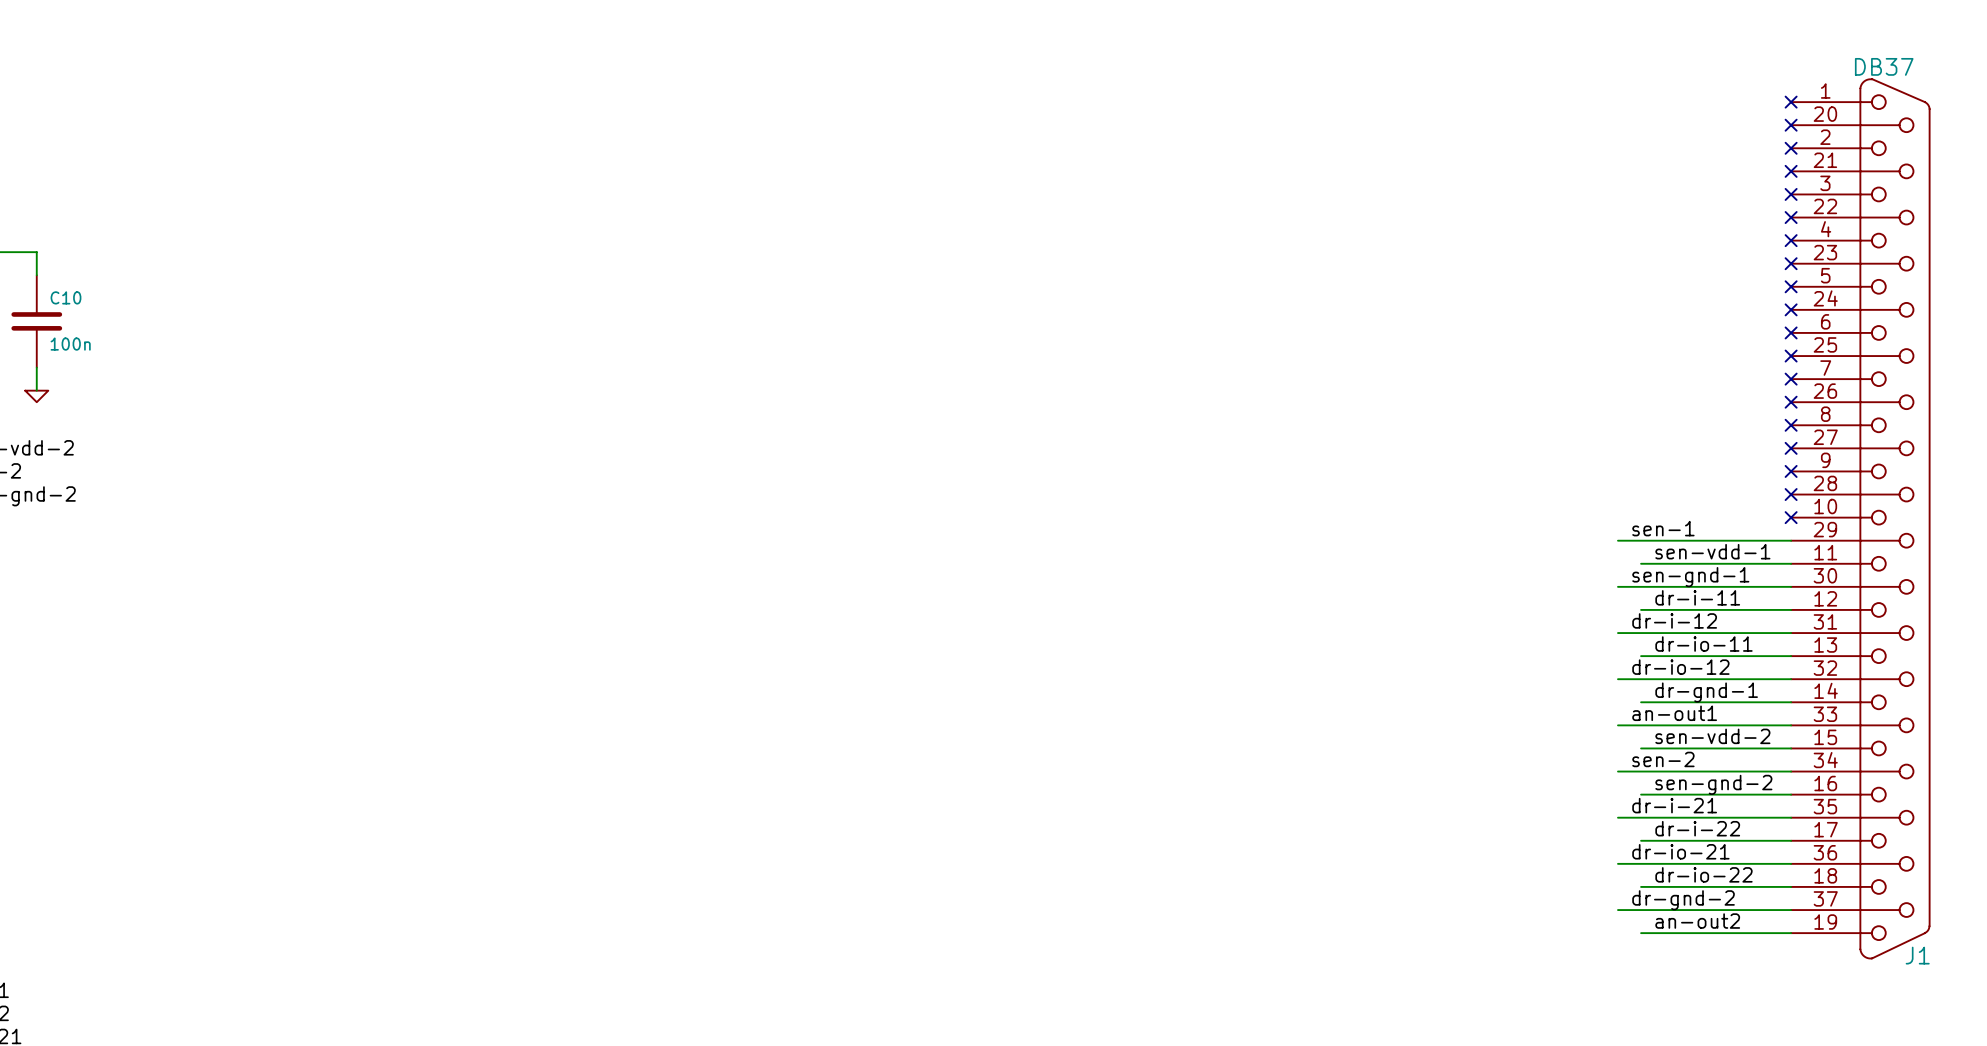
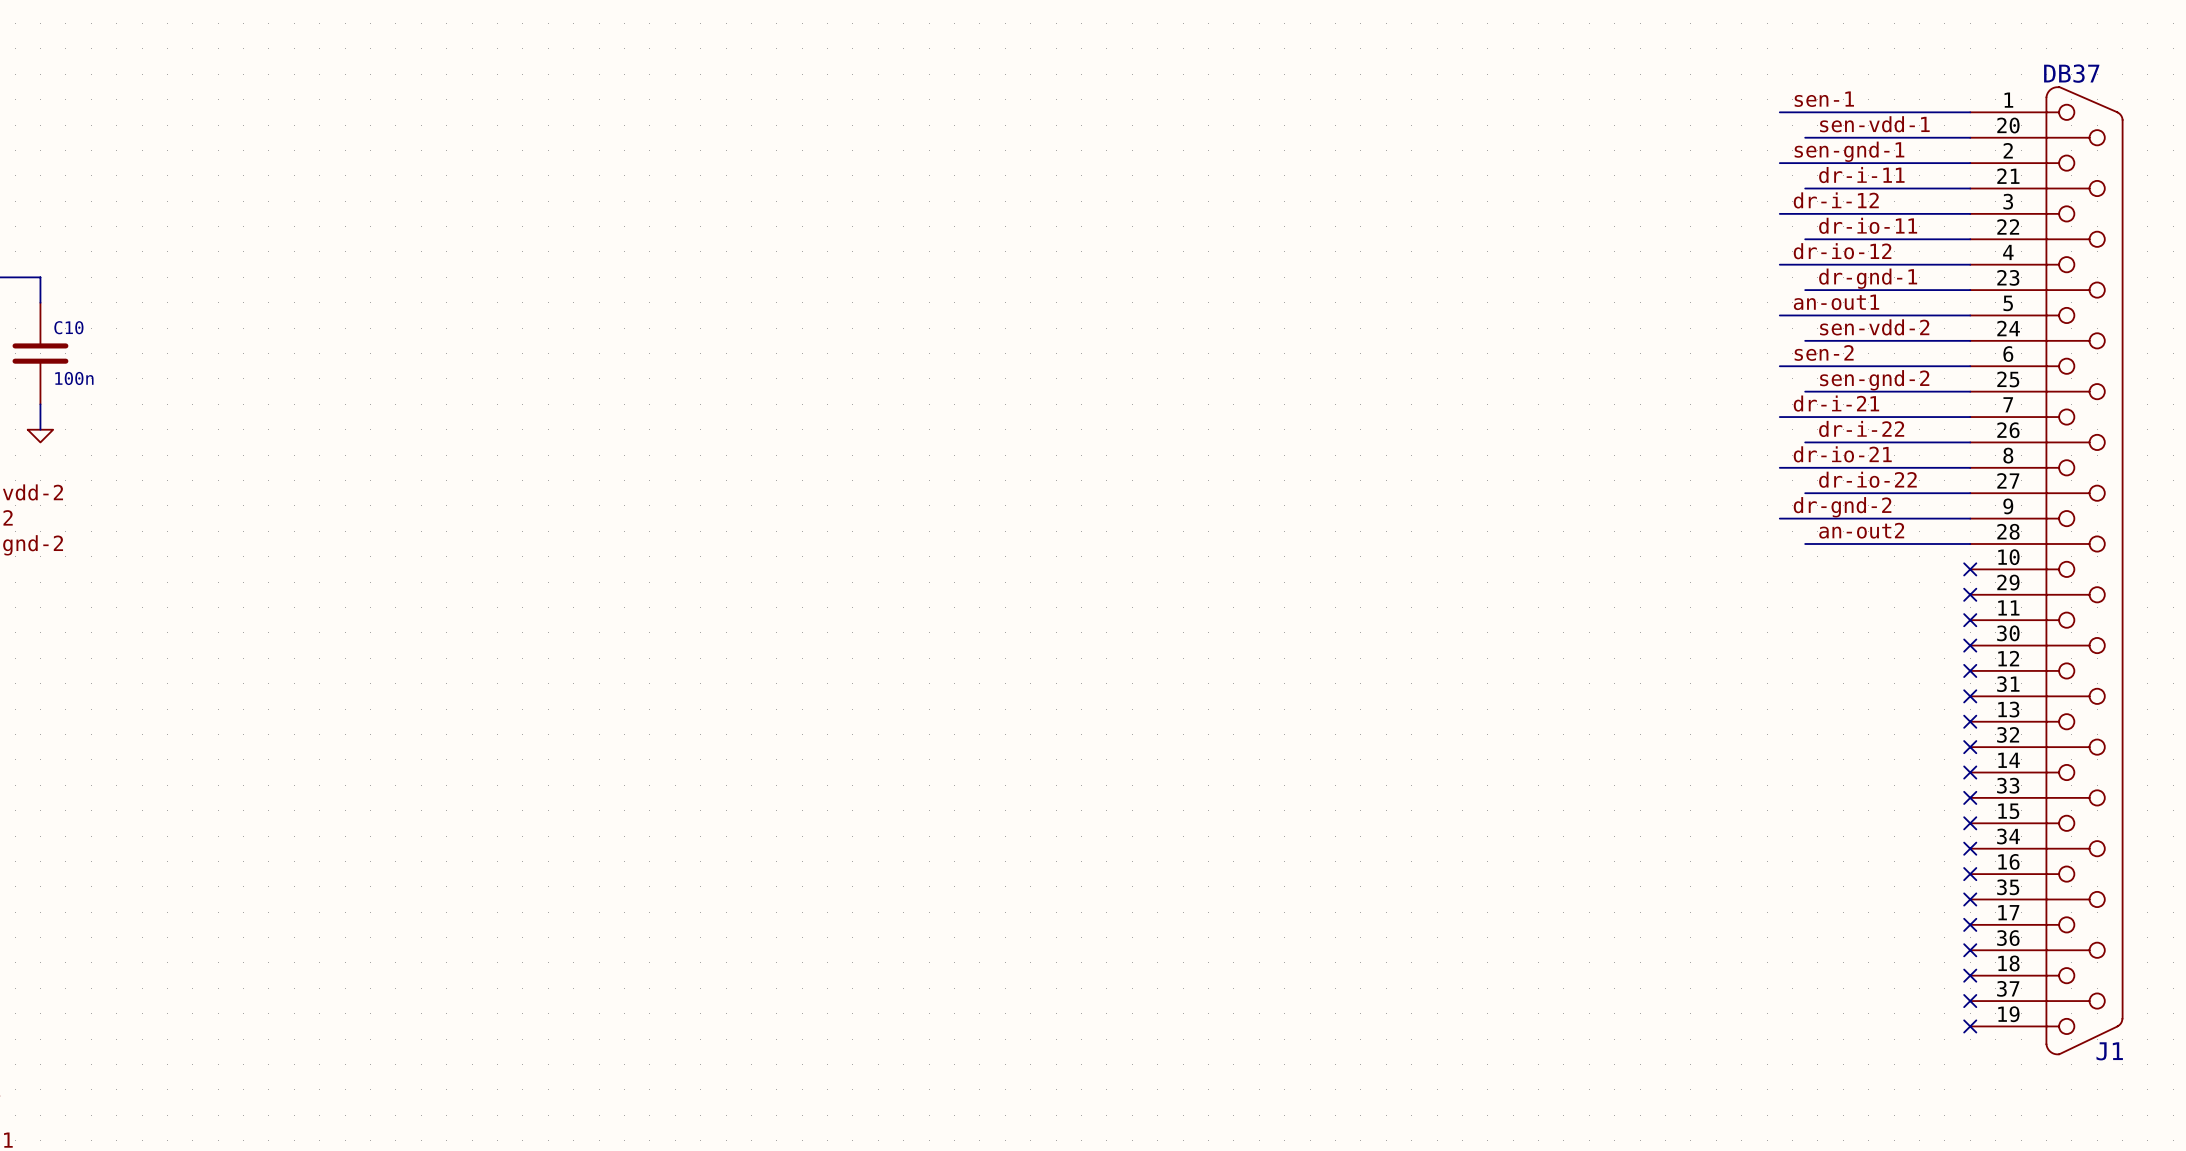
label: none -> sen-1 (1824, 99)
wire: none -> (1779, 112) (1970, 112)
no-connect mark: (1791, 102) -> none
label: none -> sen-vdd-1 (1874, 124)
wire: none -> (1805, 137) (1970, 137)
no-connect mark: (1791, 125) -> none
label: none -> sen-gnd-1 (1849, 151)
wire: none -> (1779, 163) (1970, 163)
no-connect mark: (1791, 148) -> none
label: none -> dr-i-11 (1861, 175)
wire: none -> (1805, 188) (1970, 188)
no-connect mark: (1791, 171) -> none
label: none -> dr-i-12 (1836, 200)
wire: none -> (1779, 213) (1970, 213)
no-connect mark: (1791, 194) -> none
label: none -> dr-io-11 (1868, 225)
wire: none -> (1805, 239) (1970, 239)
no-connect mark: (1791, 217) -> none
label: none -> dr-io-12 (1842, 251)
wire: none -> (1779, 264) (1970, 264)
no-connect mark: (1791, 240) -> none
label: none -> dr-gnd-1 (1868, 278)
wire: none -> (1805, 290) (1970, 290)
no-connect mark: (1791, 263) -> none
label: none -> an-out1 (1836, 302)
wire: none -> (1779, 315) (1970, 315)
no-connect mark: (1791, 286) -> none
label: none -> sen-vdd-2 (1874, 327)
wire: none -> (1805, 340) (1970, 340)
no-connect mark: (1791, 309) -> none
label: none -> sen-2 (1824, 352)
no-connect mark: (1791, 332) -> none
label: none -> sen-gnd-2 (1874, 380)
no-connect mark: (1791, 356) -> none
label: none -> dr-i-21 (1836, 403)
no-connect mark: (1791, 379) -> none
label: none -> dr-i-22 (1861, 428)
no-connect mark: (1791, 402) -> none
label: none -> dr-io-21 (1842, 454)
no-connect mark: (1791, 425) -> none
label: none -> dr-io-22 (1867, 479)
no-connect mark: (1791, 448) -> none
label: none -> dr-gnd-2 (1842, 507)
no-connect mark: (1791, 471) -> none
label: none -> an-out2 (1861, 530)
no-connect mark: (1791, 494) -> none
label: sen-1 (1663, 528) -> none
wire: (1617, 540) (1791, 540) -> (1779, 366) (1970, 366)
no-connect mark: none -> (1970, 594)
label: sen-vdd-1 (1712, 551) -> none
wire: (1641, 563) (1791, 563) -> (1805, 391) (1970, 391)
no-connect mark: none -> (1970, 620)
label: sen-gnd-1 (1690, 577) -> none
wire: (1617, 586) (1791, 586) -> (1779, 417) (1970, 417)
no-connect mark: none -> (1970, 645)
label: dr-i-11 (1697, 597) -> none
wire: (1641, 609) (1791, 609) -> (1805, 442) (1970, 442)
no-connect mark: none -> (1970, 670)
label: dr-i-12 (1674, 620) -> none
wire: (1617, 633) (1791, 633) -> (1779, 467) (1970, 467)
no-connect mark: none -> (1970, 696)
label: dr-io-11 (1703, 644) -> none
wire: (1641, 656) (1791, 656) -> (1805, 493) (1970, 493)
no-connect mark: none -> (1970, 721)
label: dr-io-12 (1680, 667) -> none
wire: (1617, 679) (1791, 679) -> (1779, 518) (1970, 518)
no-connect mark: none -> (1970, 747)
label: dr-gnd-1 (1706, 692) -> none
wire: (1641, 702) (1791, 702) -> (1805, 543) (1970, 543)
no-connect mark: none -> (1970, 772)
label: an-out1 (1674, 713) -> none
wire: (1617, 725) (1791, 725) -> none
no-connect mark: none -> (1970, 797)
label: sen-vdd-2 (1712, 736) -> none
wire: (1641, 748) (1791, 748) -> none
no-connect mark: none -> (1970, 823)
label: sen-2 (1663, 759) -> none
wire: (1617, 771) (1791, 771) -> none
no-connect mark: none -> (1970, 848)
label: sen-gnd-2 (1713, 784) -> none
wire: (1641, 794) (1791, 794) -> none
no-connect mark: none -> (1970, 874)
label: dr-i-21 (1674, 805) -> none
wire: (1617, 817) (1791, 817) -> none
no-connect mark: none -> (1970, 899)
label: dr-i-22 (1697, 828) -> none
wire: (1641, 840) (1791, 840) -> none
no-connect mark: none -> (1970, 924)
label: dr-io-21 (1680, 851) -> none
wire: (1617, 863) (1791, 863) -> none
no-connect mark: none -> (1970, 950)
label: dr-io-22 (1703, 874) -> none
wire: (1641, 886) (1791, 886) -> none
no-connect mark: none -> (1970, 975)
label: dr-gnd-2 (1683, 900) -> none
wire: (1617, 910) (1791, 910) -> none
no-connect mark: none -> (1970, 1001)
label: an-out2 (1697, 921) -> none
wire: (1641, 933) (1791, 933) -> none
no-connect mark: none -> (1970, 1026)

